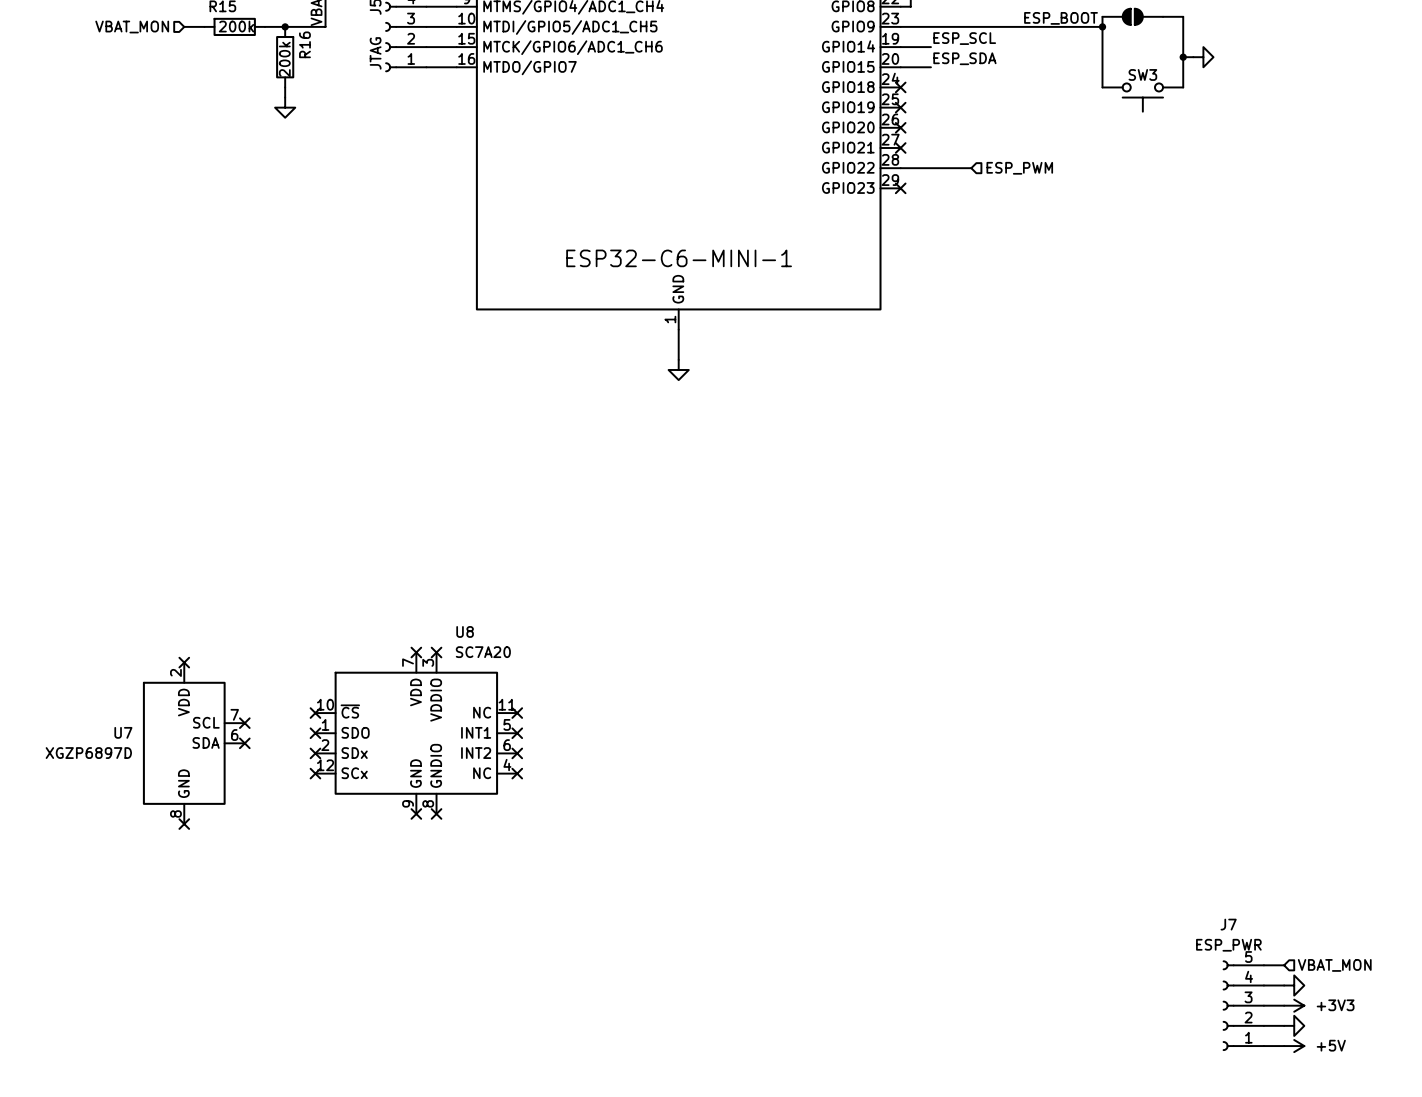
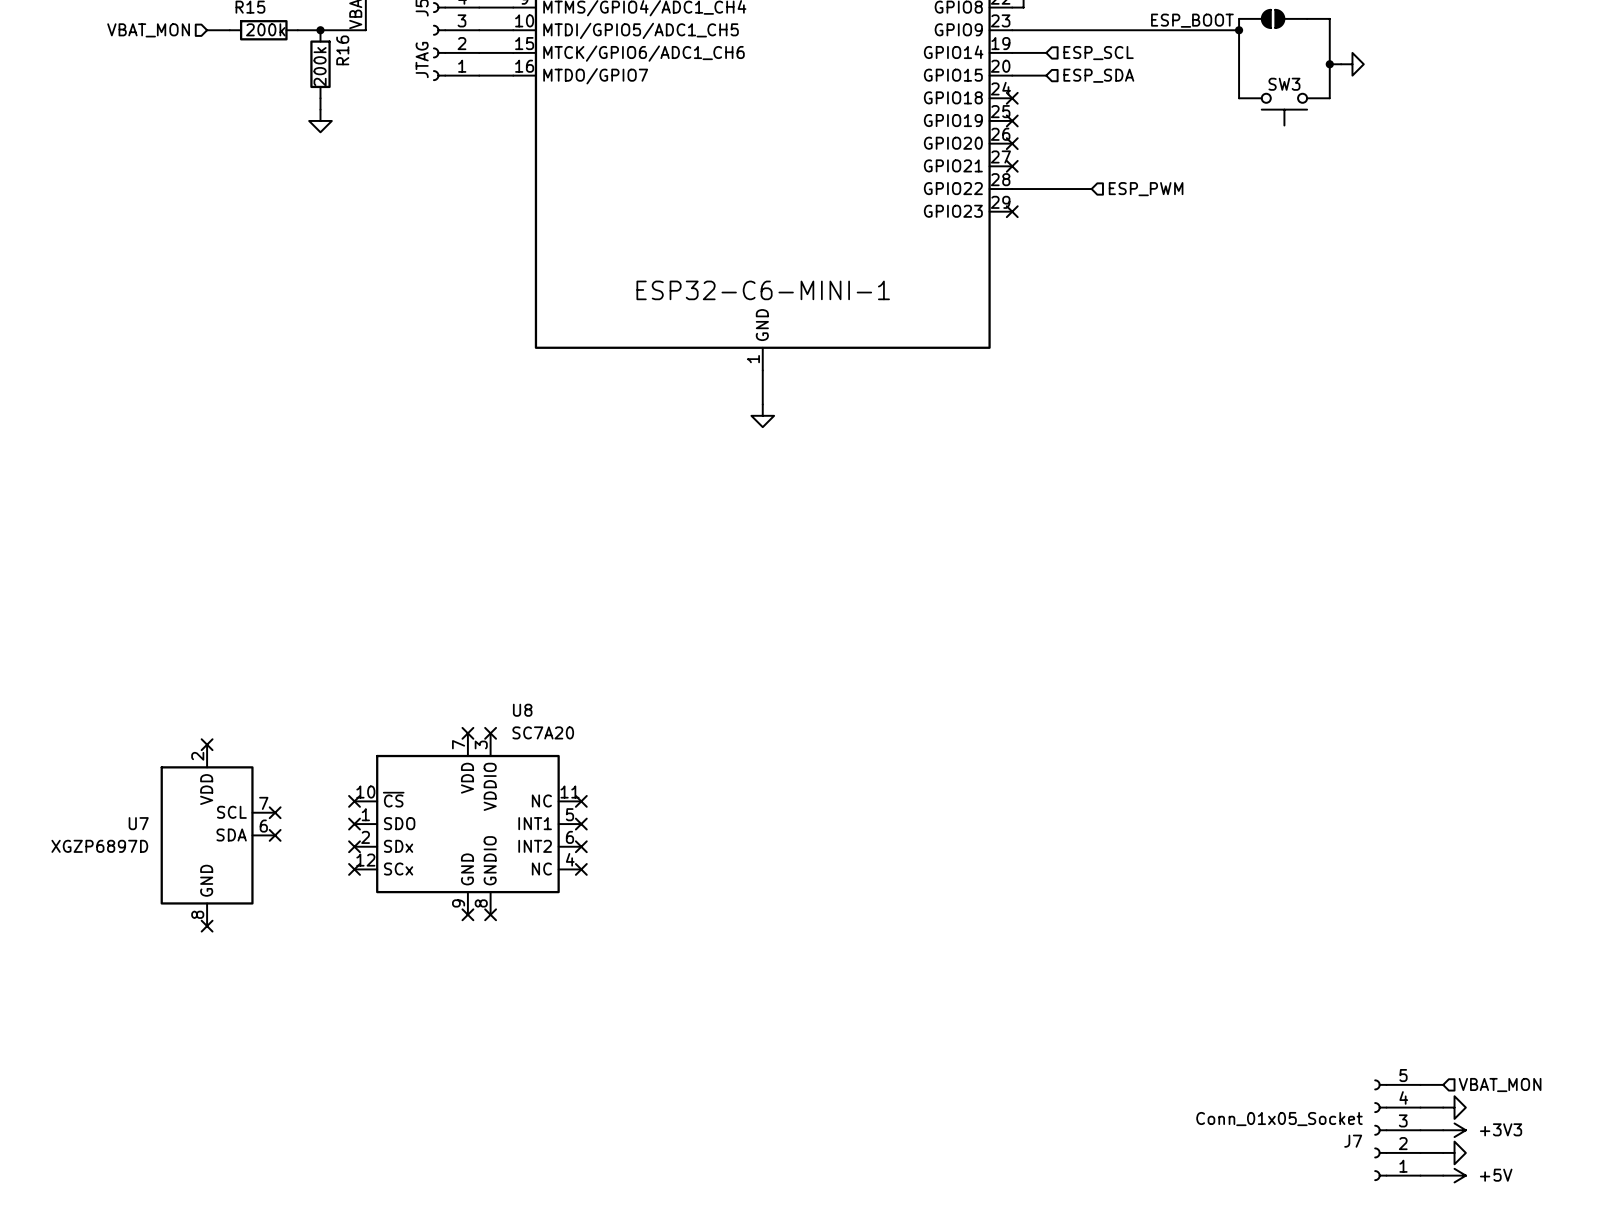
label: ESP_SCL (964, 38) -> none
hierarchical label: none -> ESP_SCL (1098, 53)
label: ESP_SDA (964, 58) -> none
hierarchical label: none -> ESP_SDA (1098, 75)
J7 name position: J7 (1228, 924) -> J7 (1353, 1141)
J7 value: ESP_PWR (1228, 945) -> Conn_01x05_Socket (1279, 1119)

